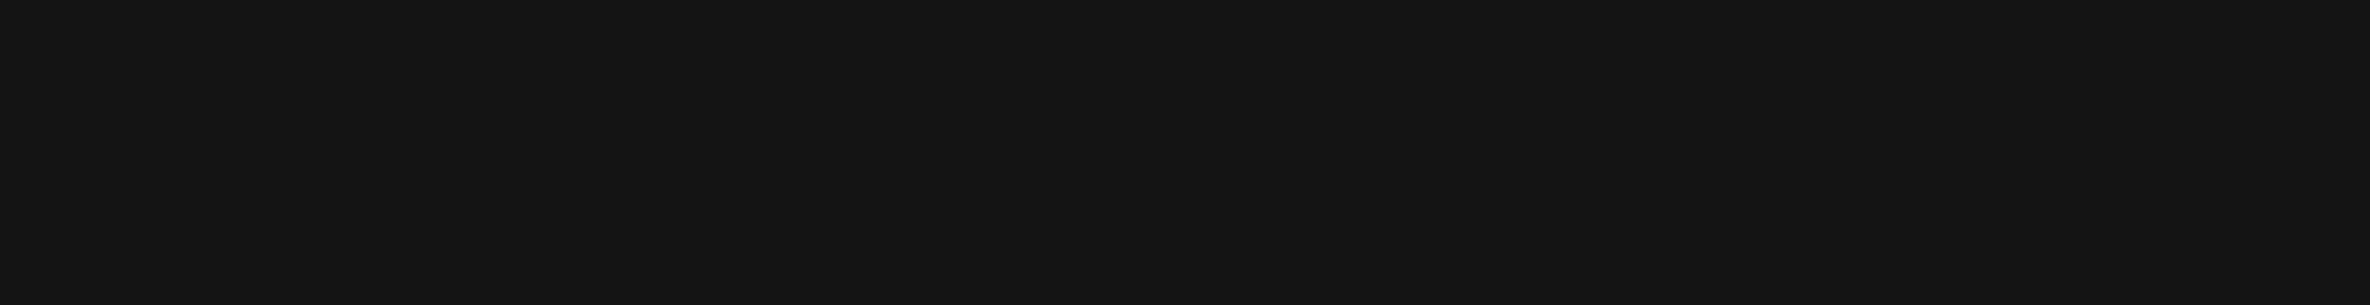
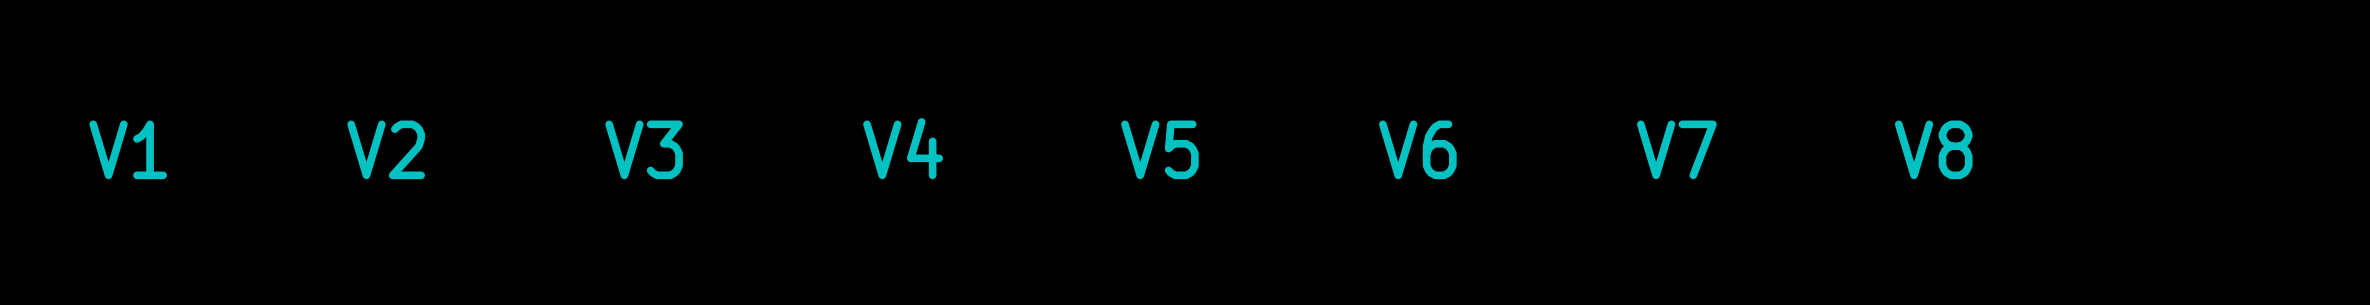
text: none -> V1 V2 V3 V4 V5 V6 V7 V8 (1030, 148)

